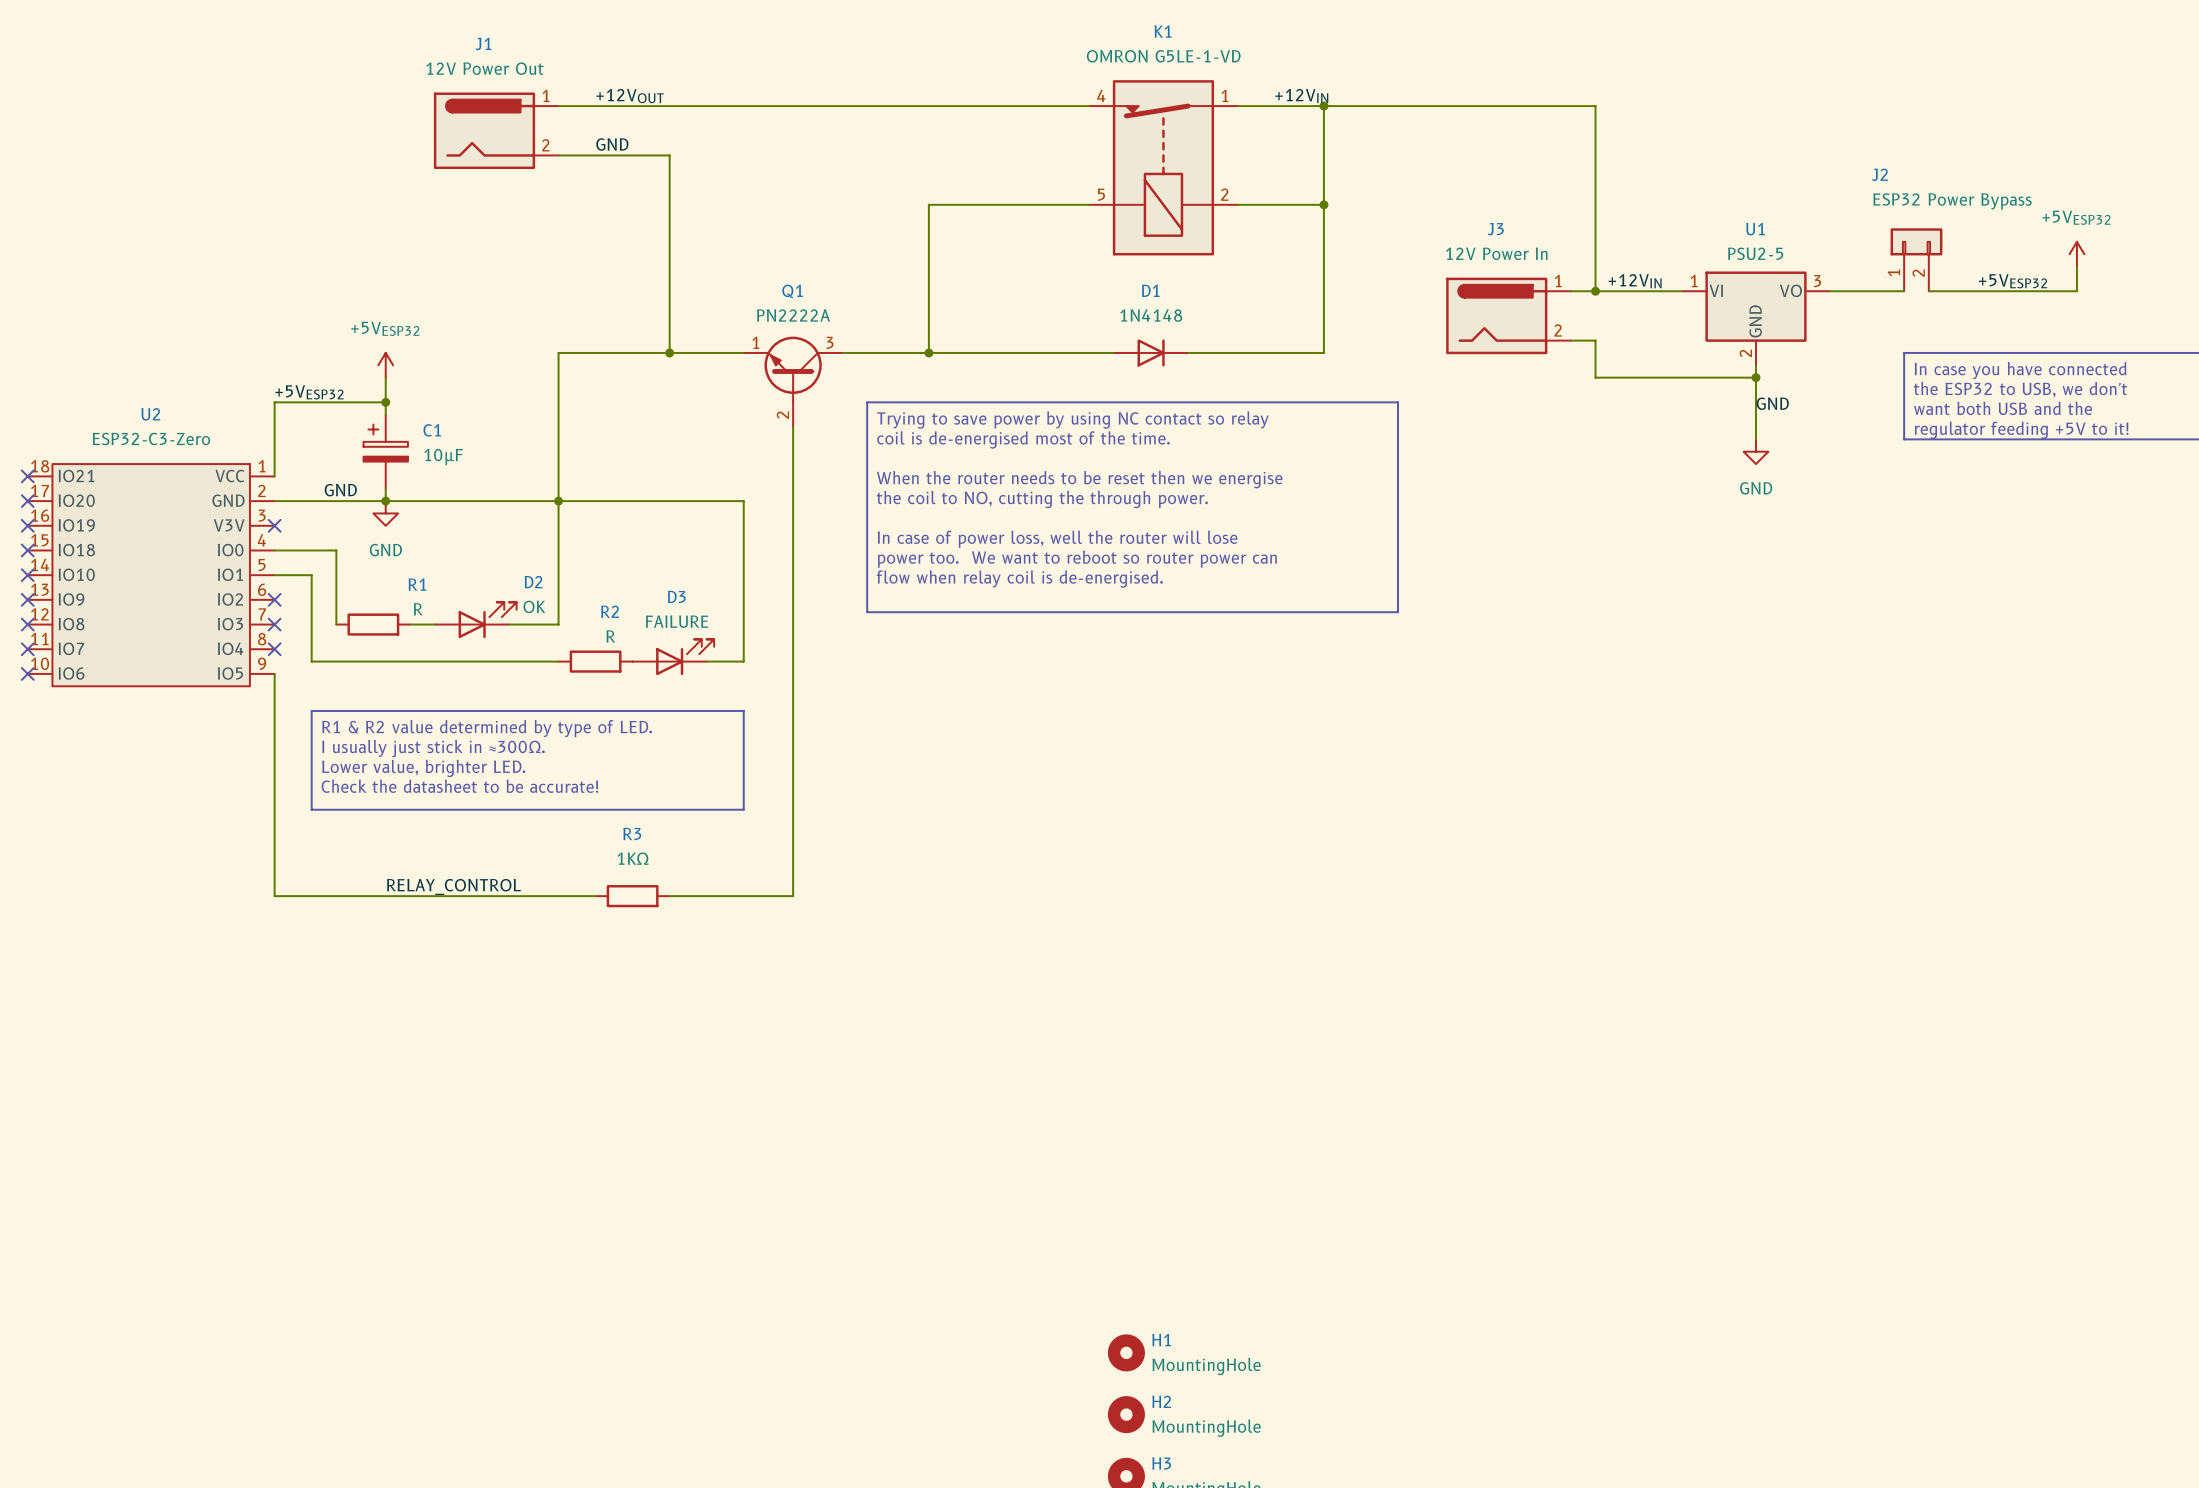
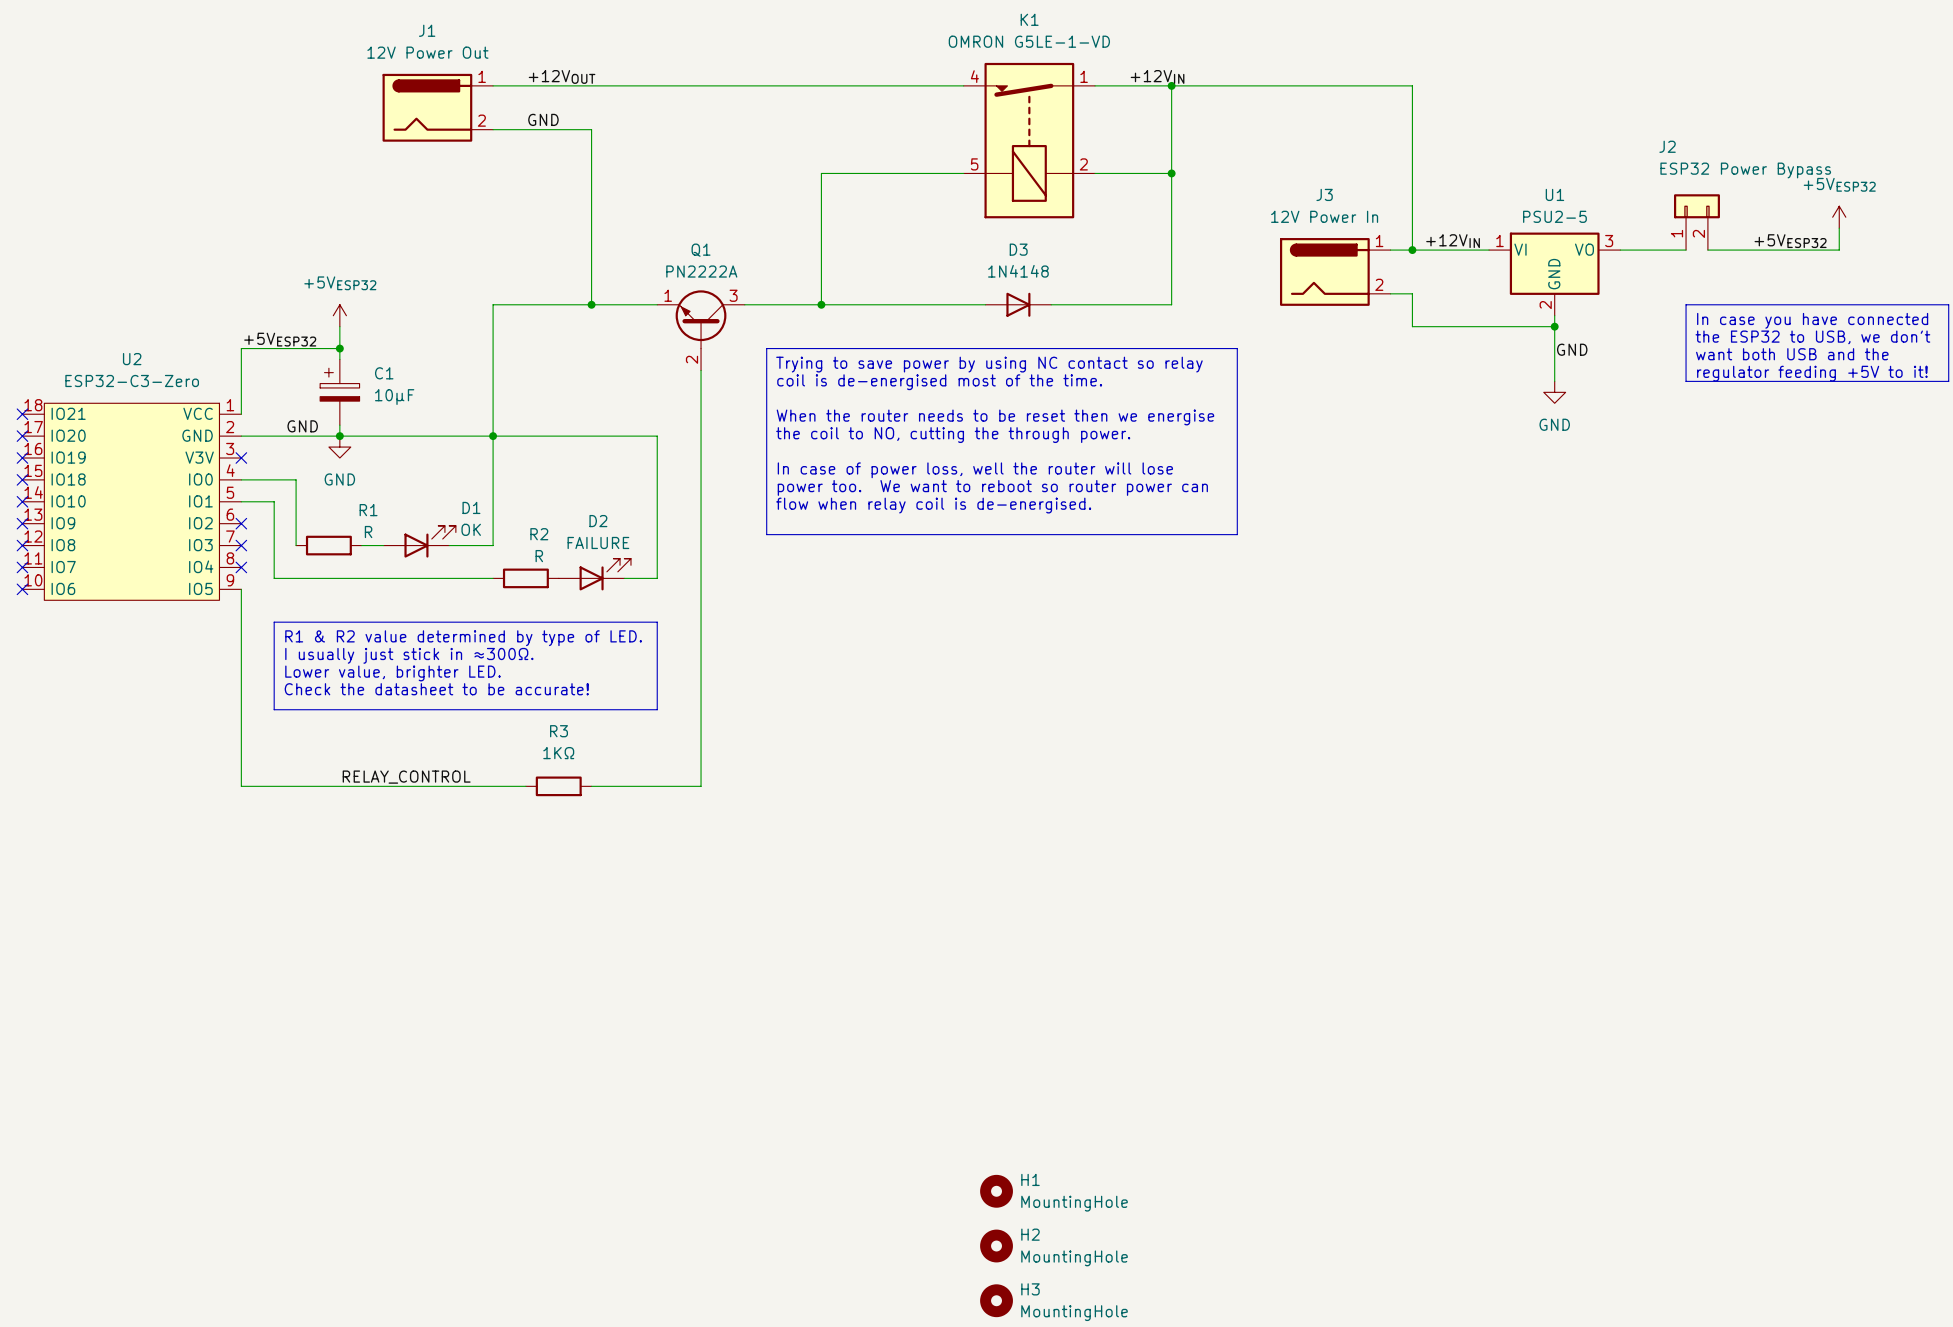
D1 name: D1 (1150, 290) -> D3 (1018, 249)
D2 name: D2 (533, 582) -> D1 (471, 507)
D3 name: D3 (676, 596) -> D2 (598, 521)

